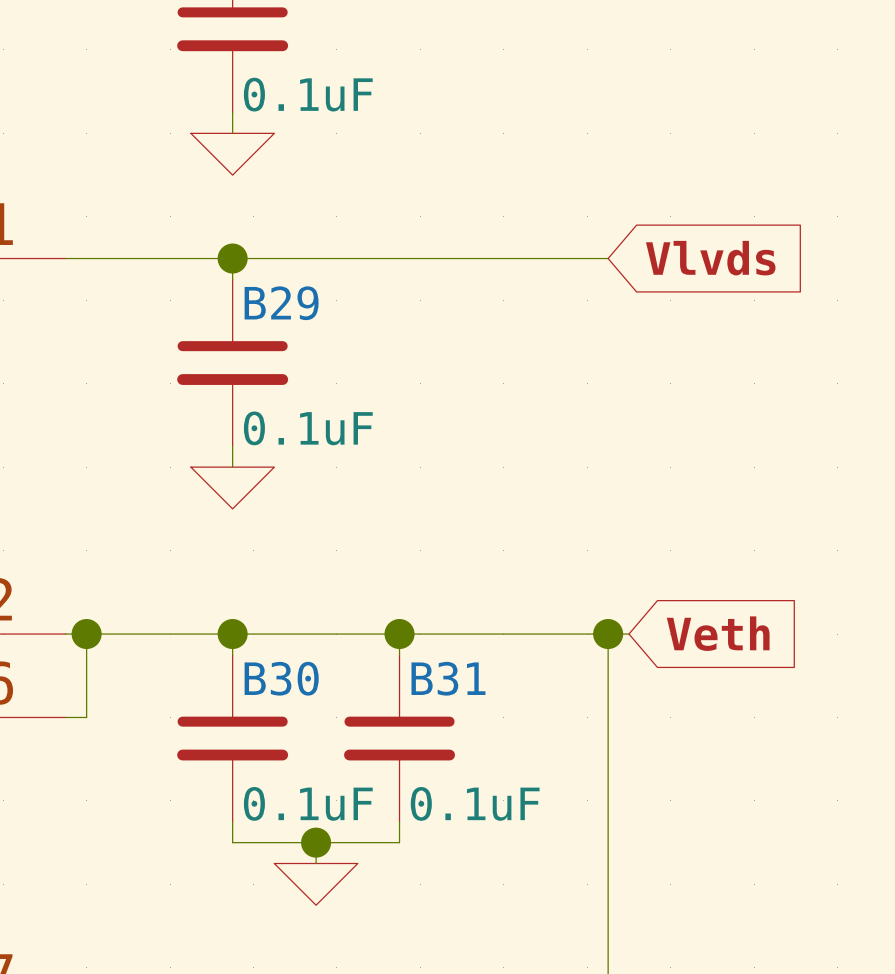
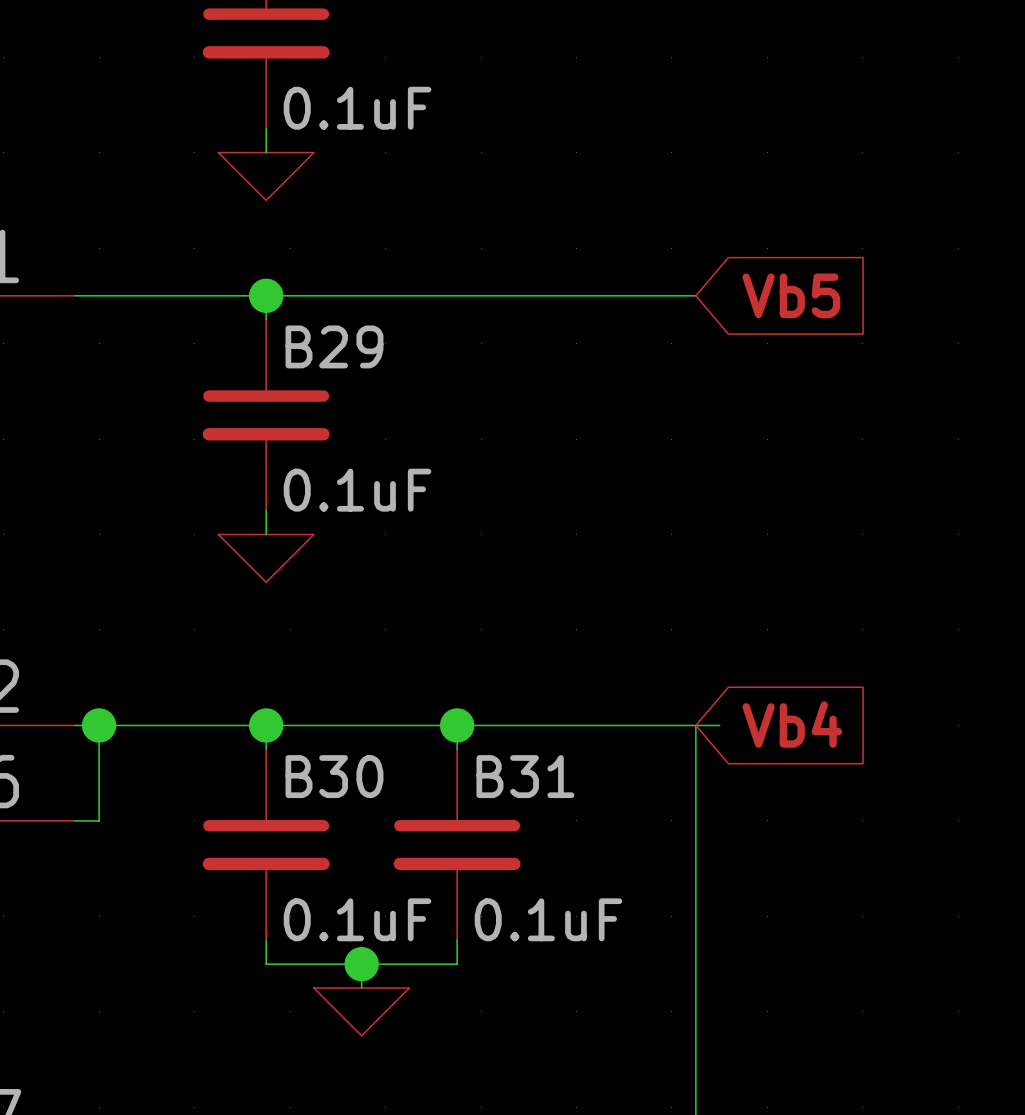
global label: Vlvds (710, 258) -> Vb5 (791, 295)
global label: Veth (718, 633) -> Vb4 (792, 724)
junction: (608, 634) -> none

